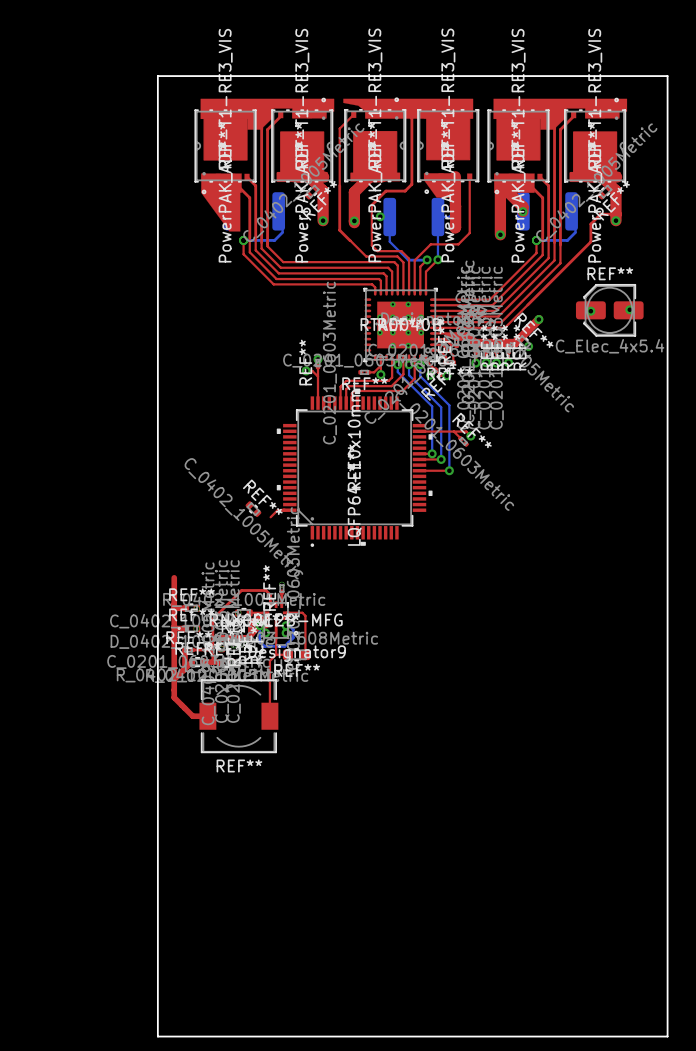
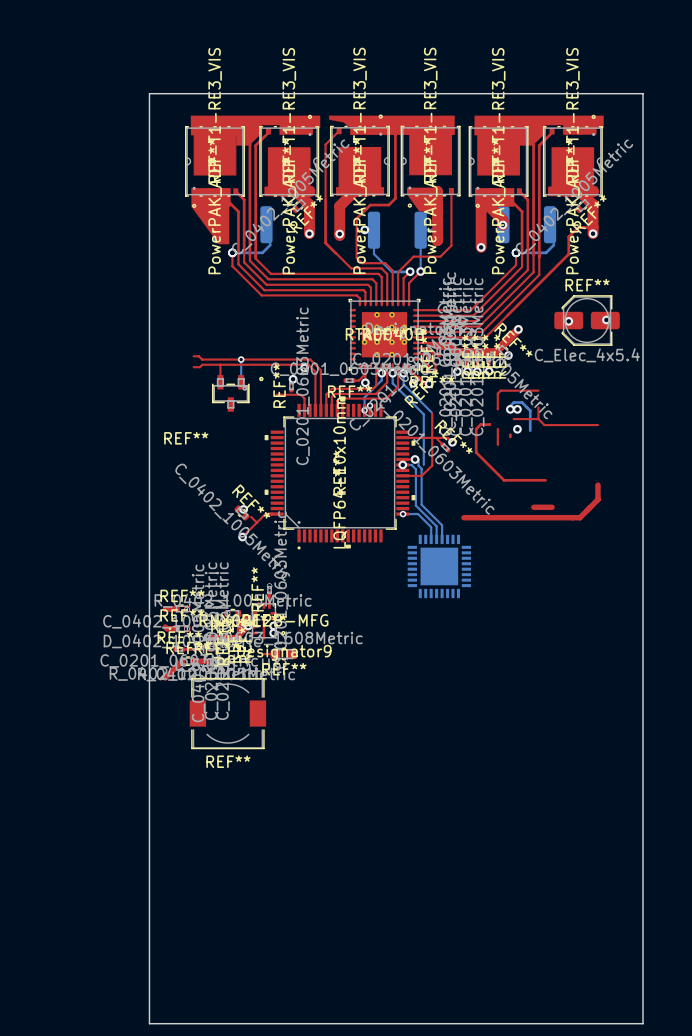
top track: none -> (193, 356) (198, 356) (202, 359) (310, 359) (320, 370) (320, 410)
bottom track: none -> (241, 359) (241, 382)
via: none -> (241, 359)
top track: none -> (220, 364) (220, 382)
top track: none -> (193, 367) (199, 367) (202, 364) (308, 364) (315, 371) (315, 410)
REF** position: (318, 363) -> (291, 386)
top track: (318, 366) (318, 376) -> none
top track: (306, 370) (312, 370) (318, 376) -> none
bottom track: (397, 372) (432, 406) (432, 453) -> (381, 380) (364, 397) (364, 410)
top track: (318, 376) (318, 390) -> (276, 394) (300, 394) (304, 398)
top track: none -> (538, 390) (500, 390) (497, 393) (497, 409)
REF**: none -> (237, 393)
via: none -> (370, 405)
top track: none -> (538, 407) (538, 419)
bottom track: none -> (510, 409) (510, 406) (513, 402) (522, 402) (530, 410) (530, 430)
via: none -> (510, 409)
via: none -> (517, 409)
via: none -> (364, 410)
bottom track: (449, 405) (449, 470) -> none
top track: none -> (513, 419) (538, 419)
top track: none -> (538, 419) (544, 425) (597, 425)
top track: none -> (489, 424) (480, 424) (476, 429) (476, 452) (504, 480) (545, 480)
top track: none -> (497, 428) (498, 444)
via: none -> (517, 429)
top track: none -> (510, 434) (510, 436)
bottom track: none -> (418, 459) (418, 465) (421, 468) (421, 504) (442, 525) (442, 539)
top track: (419, 459) (441, 459) -> none
bottom track: none -> (402, 464) (411, 464) (415, 469) (415, 505) (436, 526) (436, 539)
via: none -> (402, 464)
via: (441, 459) -> none
top track: (439, 470) (449, 470) -> (421, 475) (432, 465) (432, 413)
via: (449, 470) -> none
top track: none -> (597, 485) (597, 499) (579, 517) (463, 517)
top track: none -> (533, 507) (552, 507)
via: none -> (243, 509)
bottom track: none -> (403, 514) (418, 514) (431, 527) (431, 539)
via: none -> (403, 514)
top track: none -> (251, 516) (257, 522)
top track: none -> (258, 520) (242, 536)
via: none -> (242, 536)
part: none -> (439, 566)
top track: (174, 577) (174, 697) (192, 716) (207, 716) -> none
top track: (270, 604) (270, 595) (265, 590) (241, 590) (212, 619) (212, 662) -> none
top track: (265, 612) (249, 613) -> none
top track: (286, 612) (302, 612) (305, 615) (305, 654) -> none
bottom track: (286, 625) (289, 625) (293, 629) (293, 637) (284, 646) (264, 646) -> none
bottom track: (259, 626) (259, 641) (264, 646) -> none
top track: (276, 629) (276, 654) (269, 660) (269, 716) -> none
via: (265, 633) -> none
top track: (185, 649) (185, 668) -> none

